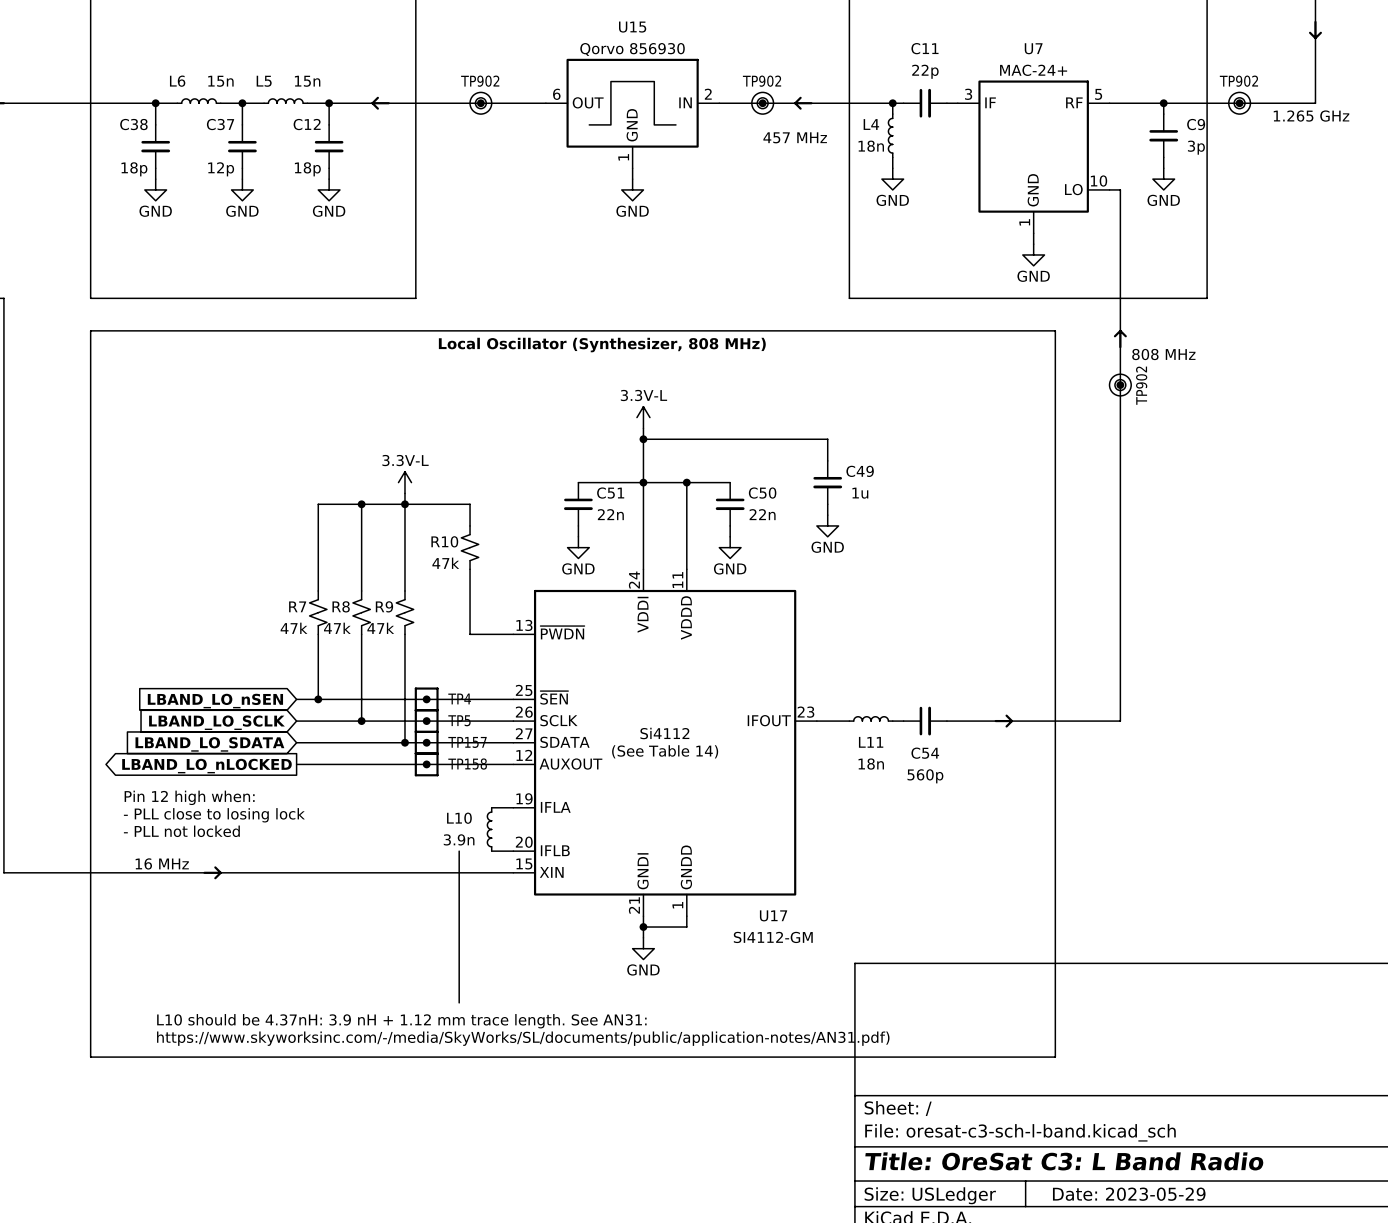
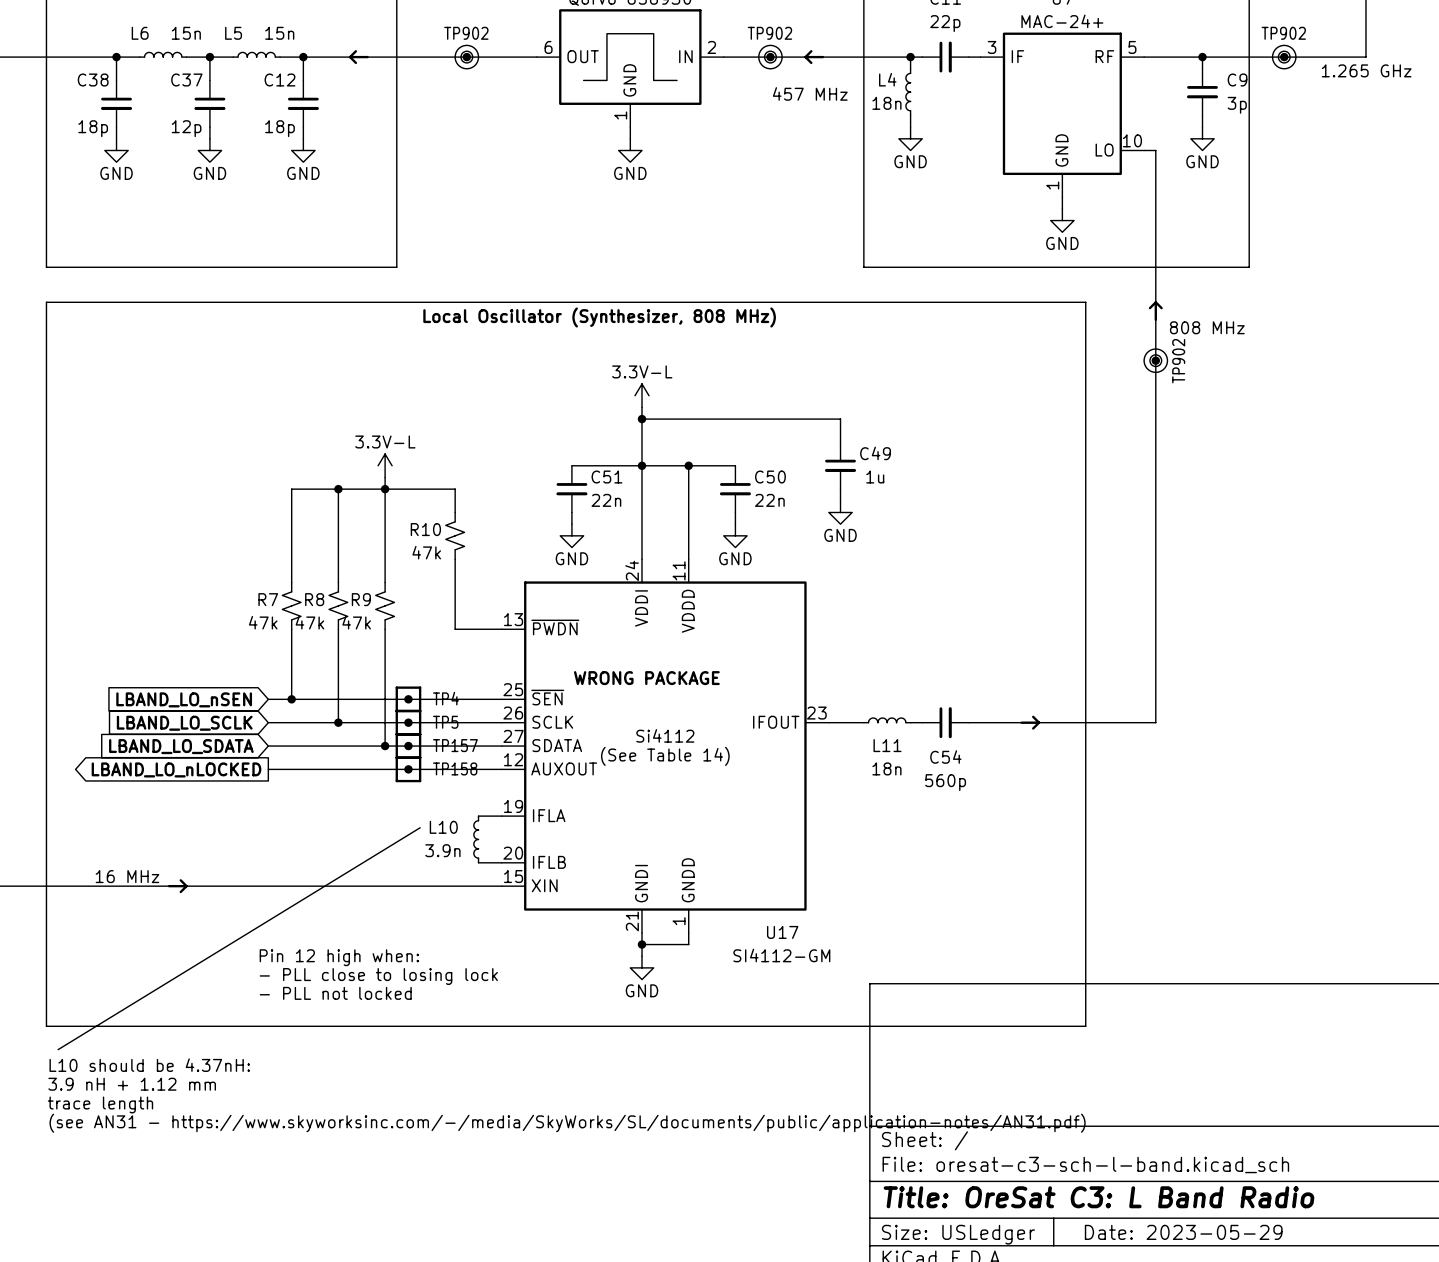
text: none -> WRONG PACKAGE (646, 678)
text: Pin 12 high when: (189, 797) -> none
text: - PLL close to losing lock (214, 815) -> none
line: none -> (420, 827) (58, 1049)
text: - PLL not locked (181, 831) -> none
line: (459, 851) (459, 1002) -> none
text: none -> Pin 12 high when: (339, 957)
text: none -> - PLL close to losing lock (378, 976)
text: none -> - PLL not locked (335, 993)
line: (90, 1002) (90, 1057) (1055, 1057) (1055, 1002) -> (46, 1026) (1085, 1026)
text: L10 should be 4.37nH: 3.9 nH + 1.12 mm trace length. See AN31: (401, 1021) -> none
text: https://www.skyworksinc.com/-/media/SkyWorks/SL/documents/public/application-notes/AN31.pdf) (523, 1038) -> none
text: none -> L10 should be 4.37nH: (149, 1065)
text: none -> 3.9 nH + 1.12 mm (132, 1084)
text: none -> trace length (100, 1104)
text: none -> (see AN31 - https://www.skyworksinc.com/-/media/SkyWorks/SL/documents/public/application-notes/AN31.pdf) (567, 1123)

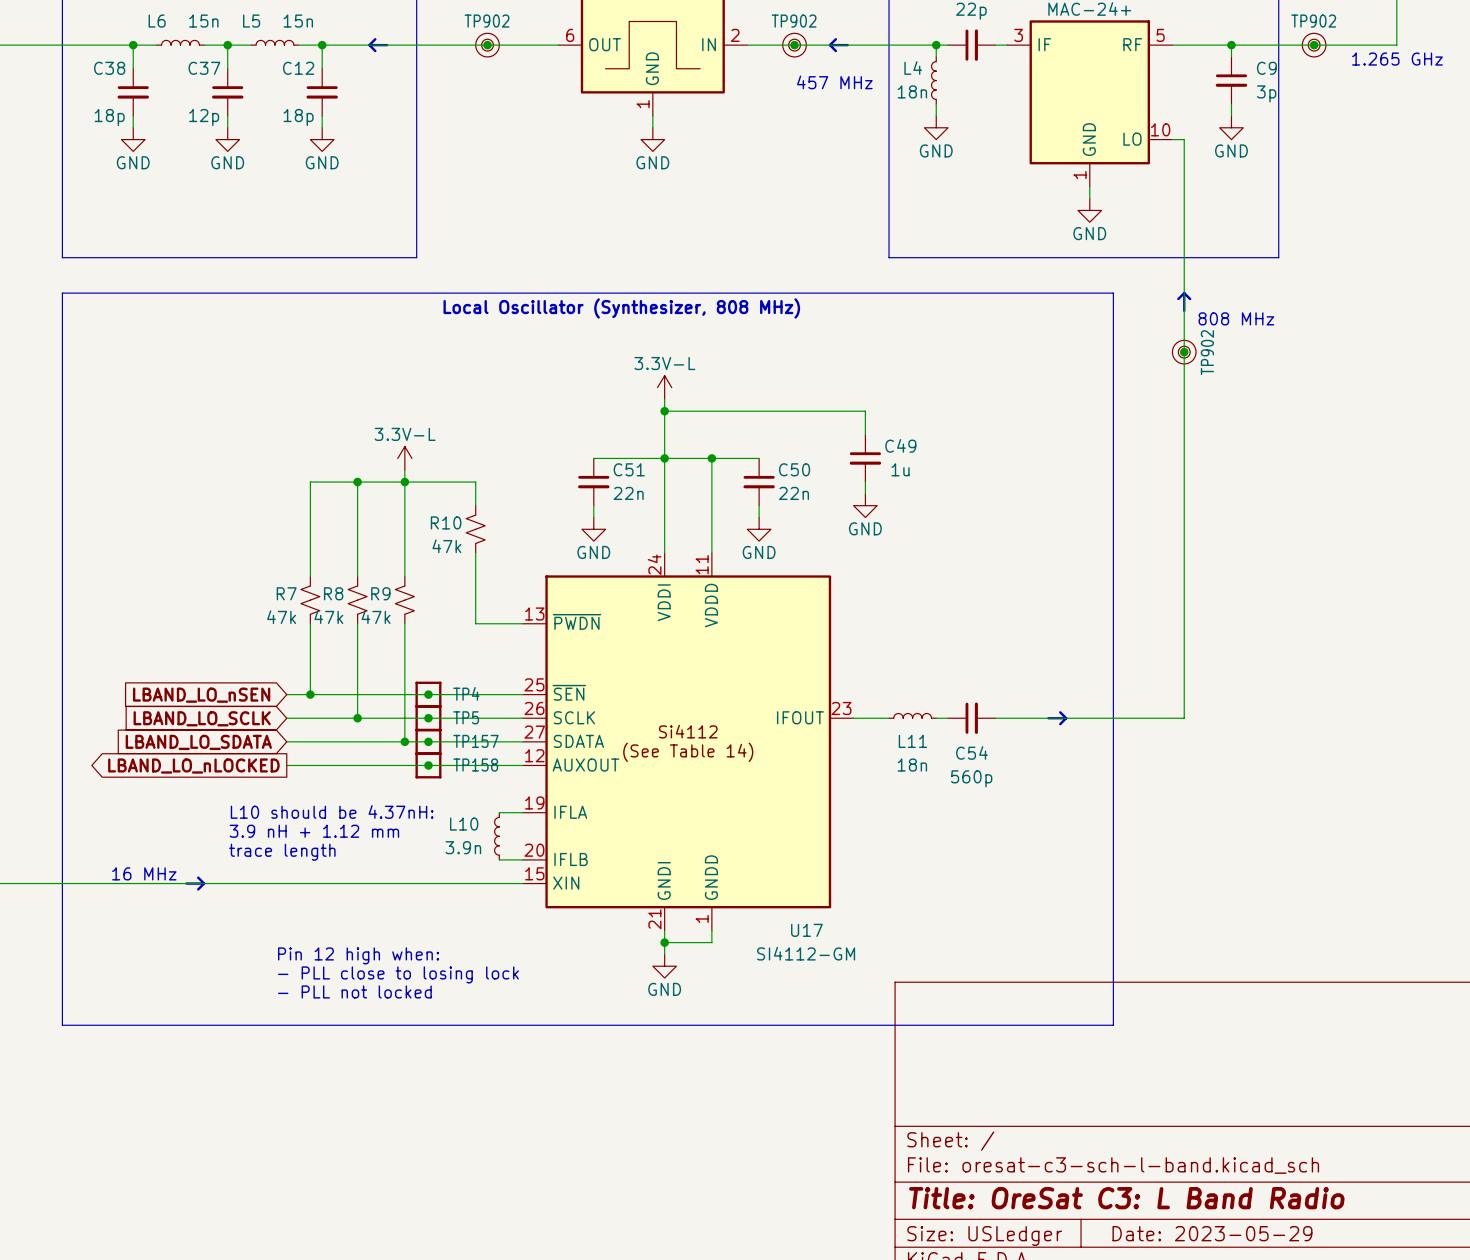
text: WRONG PACKAGE (646, 678) -> none
text: none -> L10 should be 4.37nH: (332, 811)
line: (420, 827) (58, 1049) -> none
text: none -> 3.9 nH + 1.12 mm (314, 831)
text: none -> trace length (282, 852)
text: L10 should be 4.37nH: (149, 1065) -> none
text: 3.9 nH + 1.12 mm (132, 1084) -> none
text: trace length (100, 1104) -> none
text: (see AN31 - https://www.skyworksinc.com/-/media/SkyWorks/SL/documents/public/application-notes/AN31.pdf) (567, 1123) -> none

